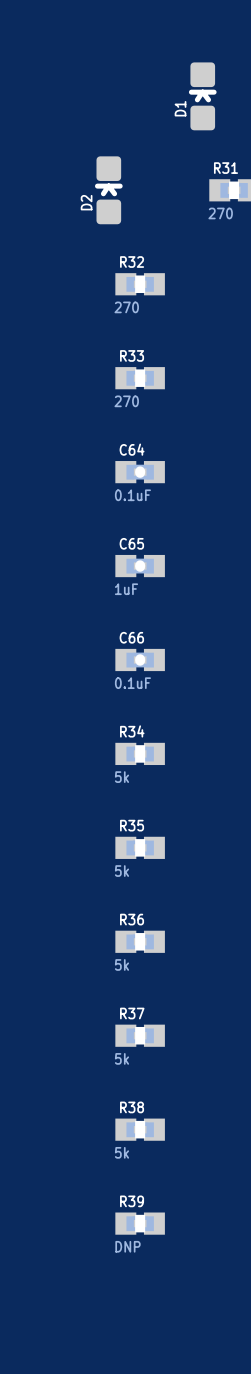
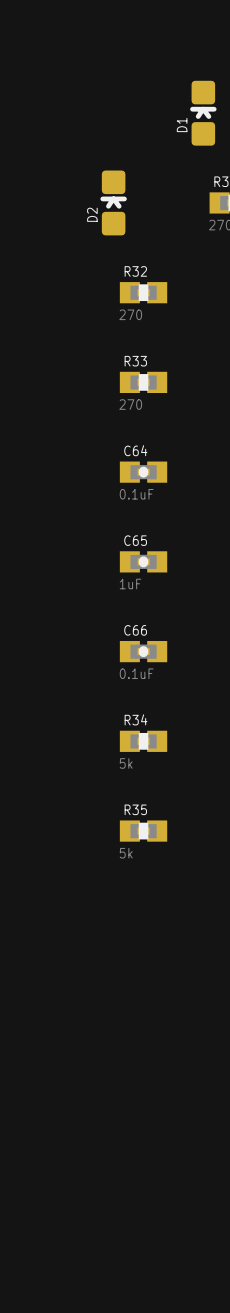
R36: 5k (140, 941) -> none
R37: 5k (140, 1035) -> none
R38: 5k (140, 1129) -> none
R39: DNP (140, 1223) -> none

